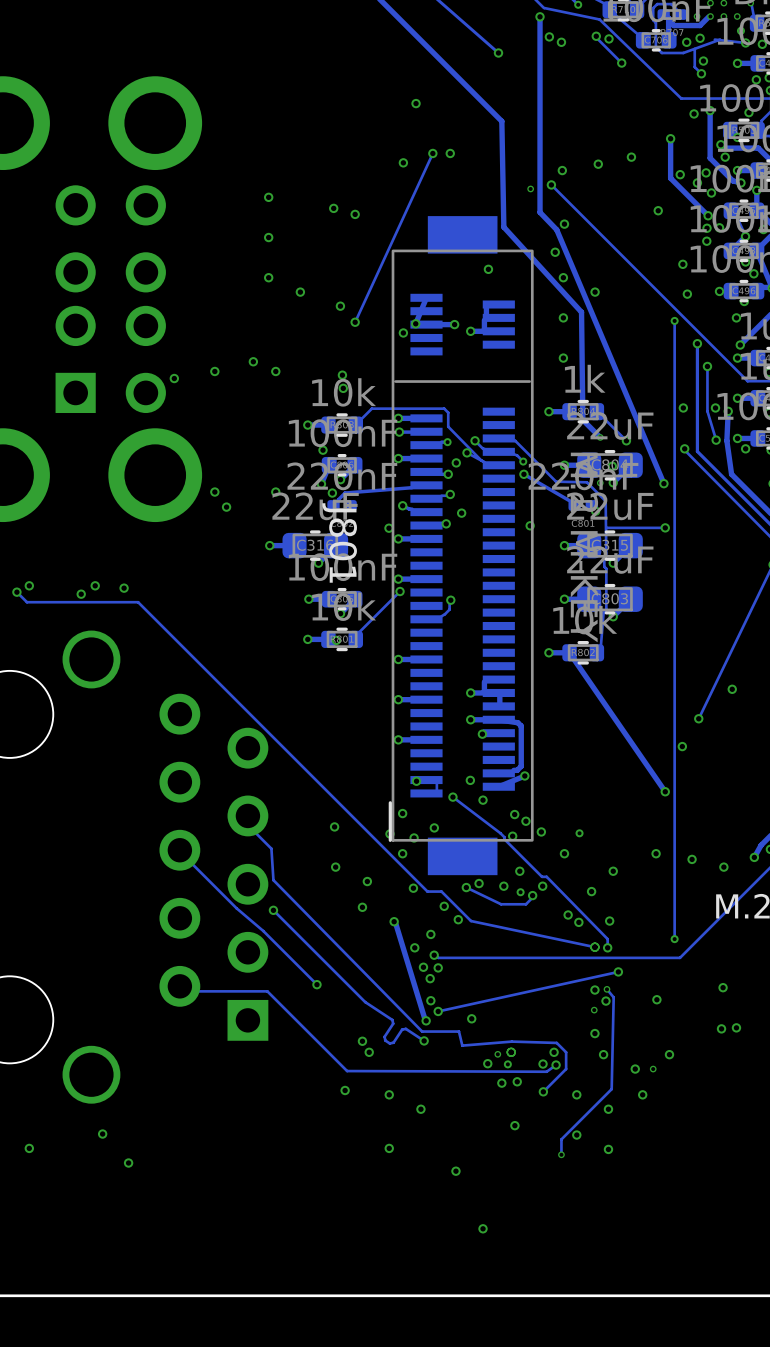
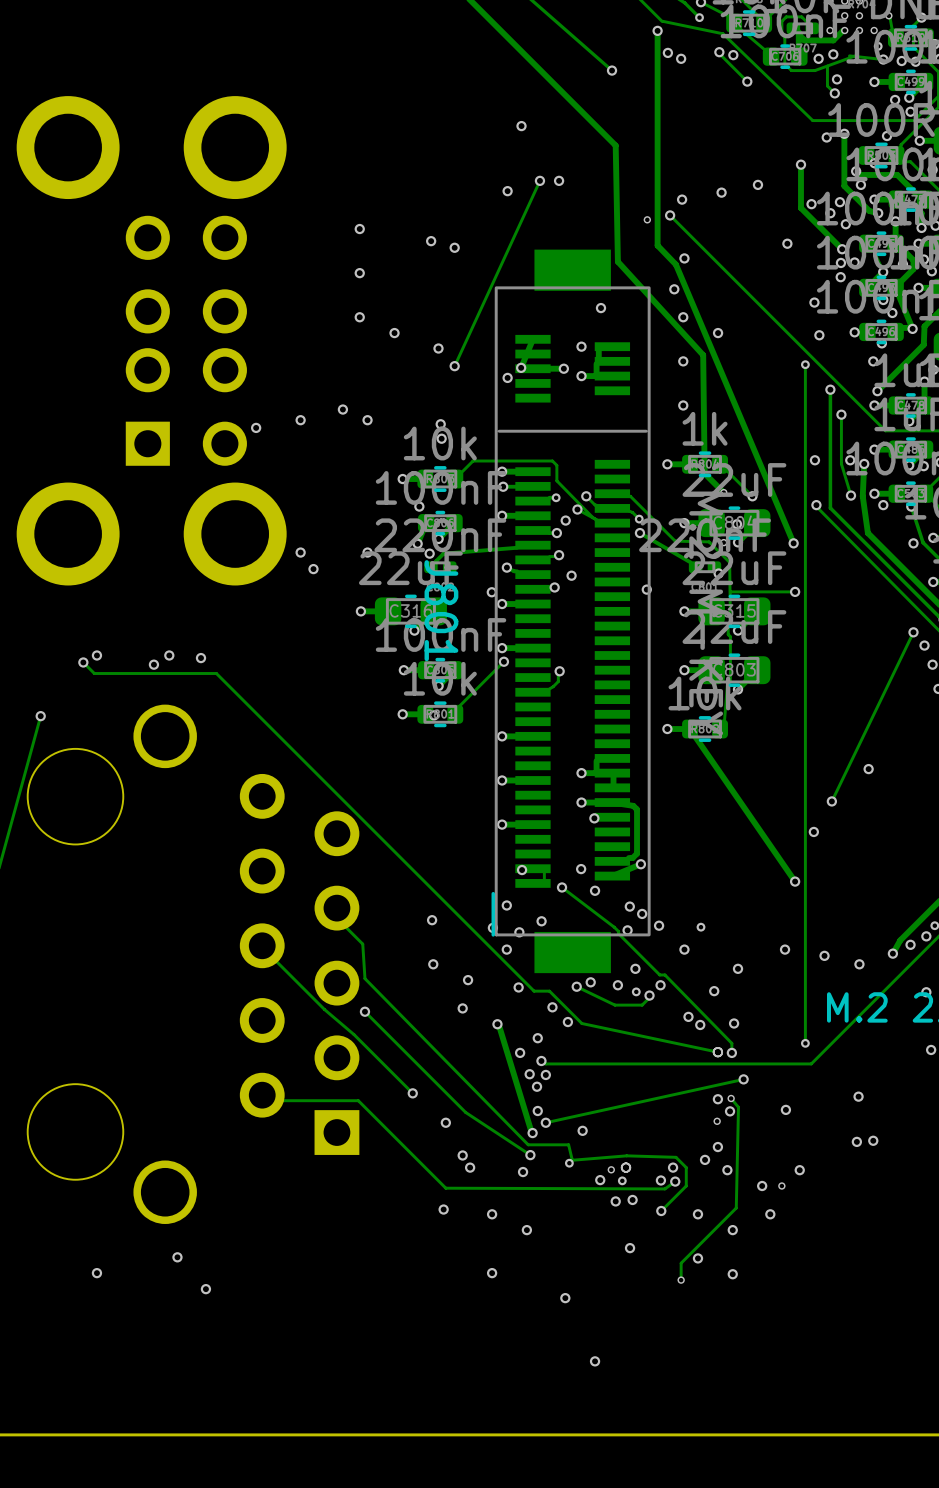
via: none -> (581, 346)
via: none -> (445, 1122)
track: (392, 1020) (393, 1023) (384, 1036) (385, 1040) (389, 1043) (393, 1042) (402, 1029) (405, 1028) -> (495, 1132) (510, 1141)
via: none -> (705, 1159)
via: none -> (569, 1163)
via: none -> (523, 1172)

